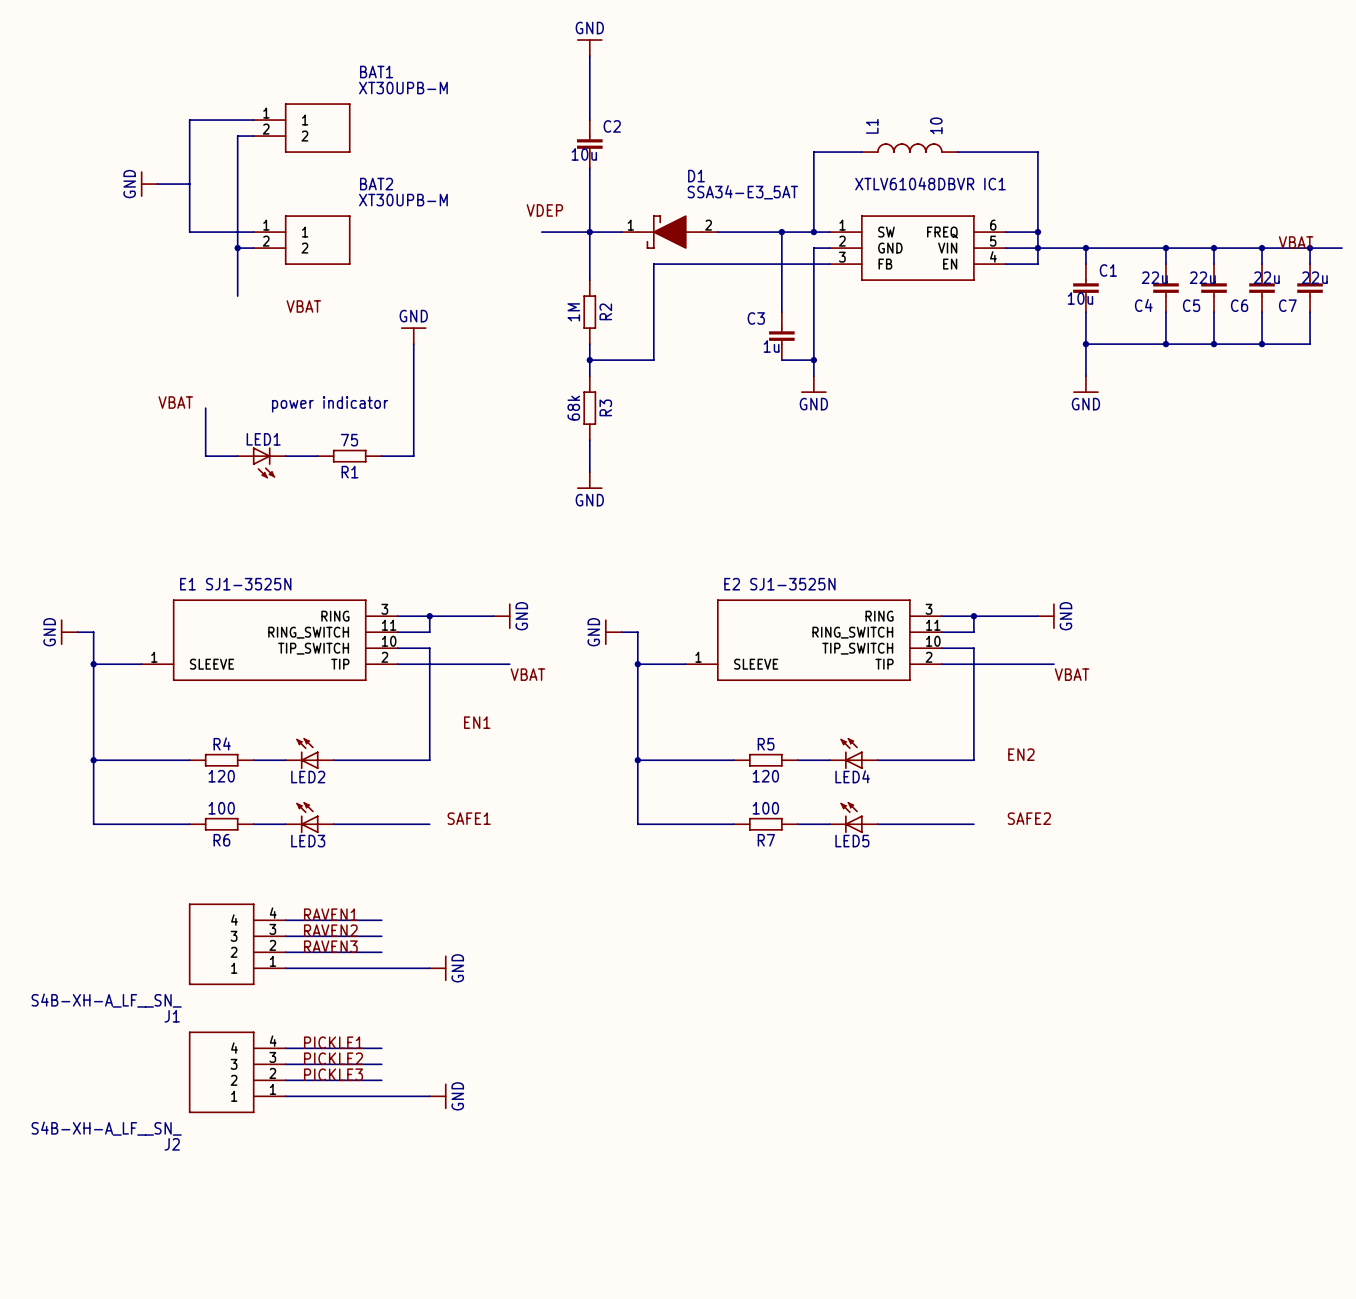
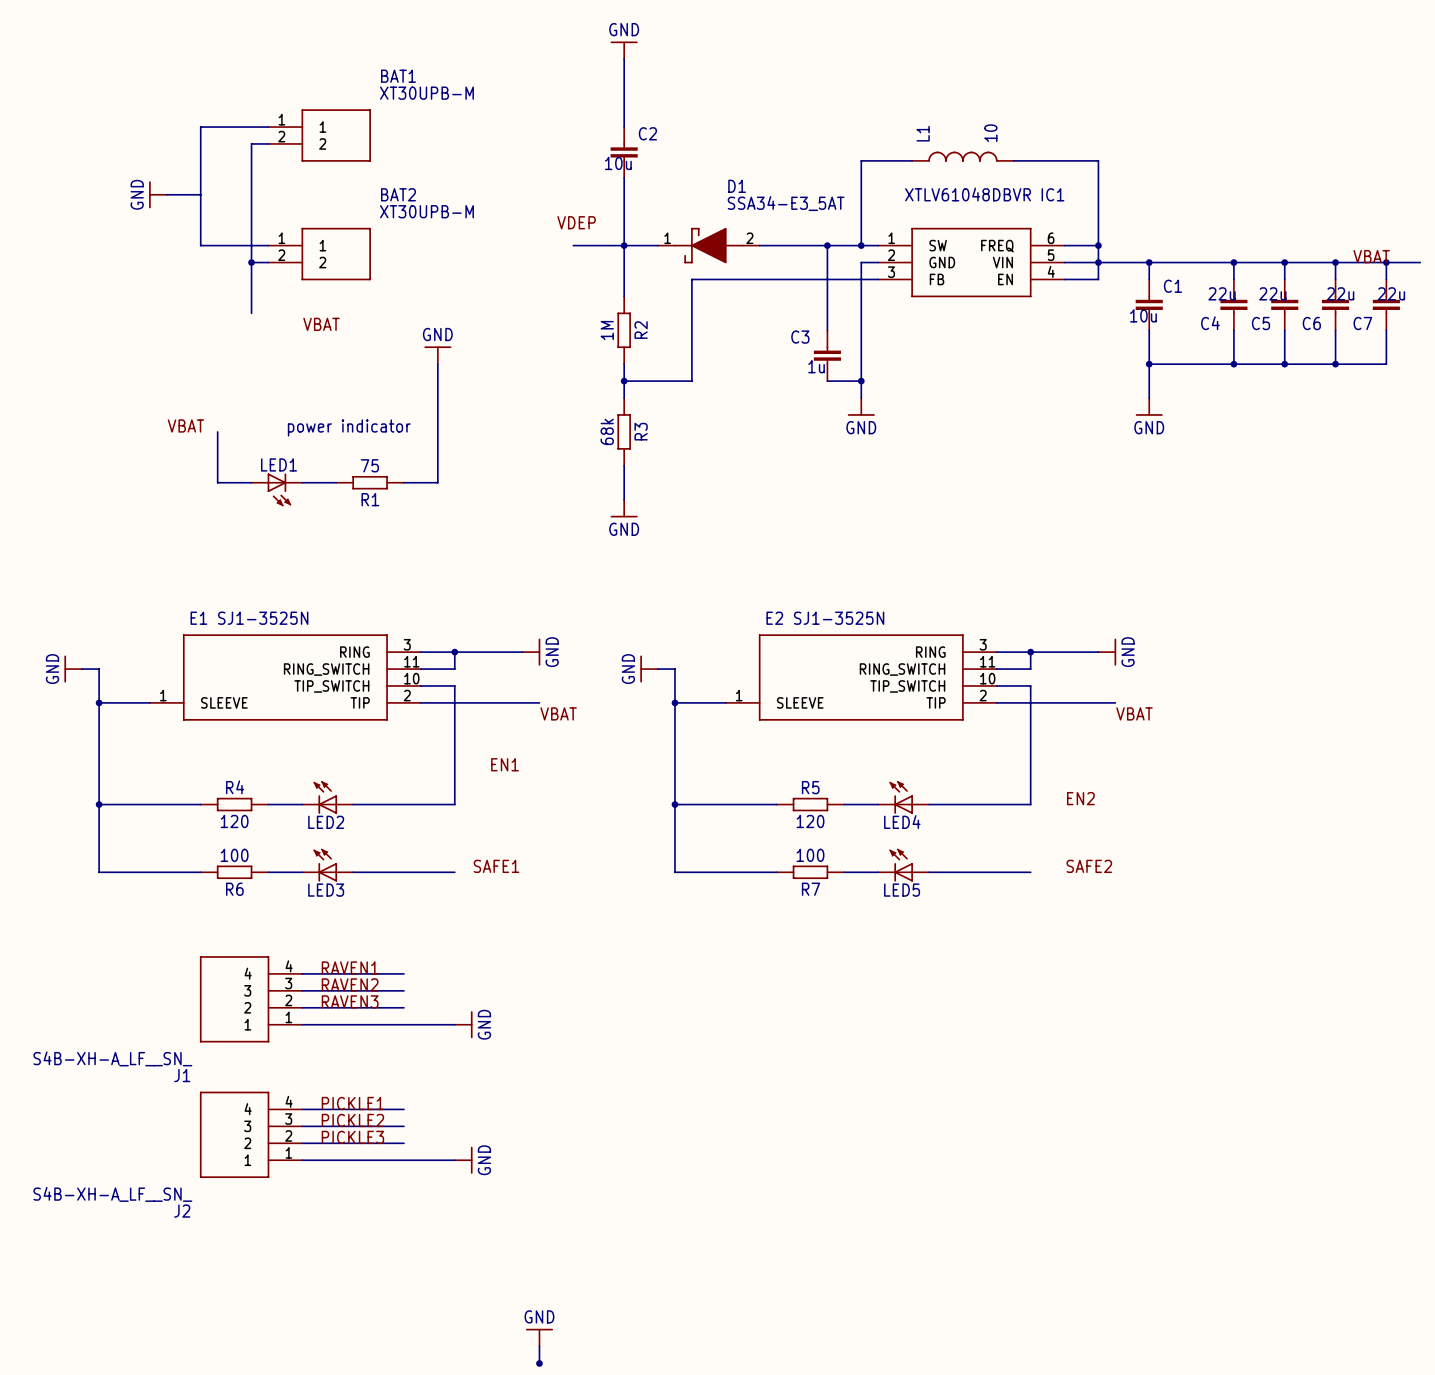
power symbol: none -> GND (539, 1337)
wire: none -> (539, 1346) (539, 1363)
junction: none -> (539, 1363)

